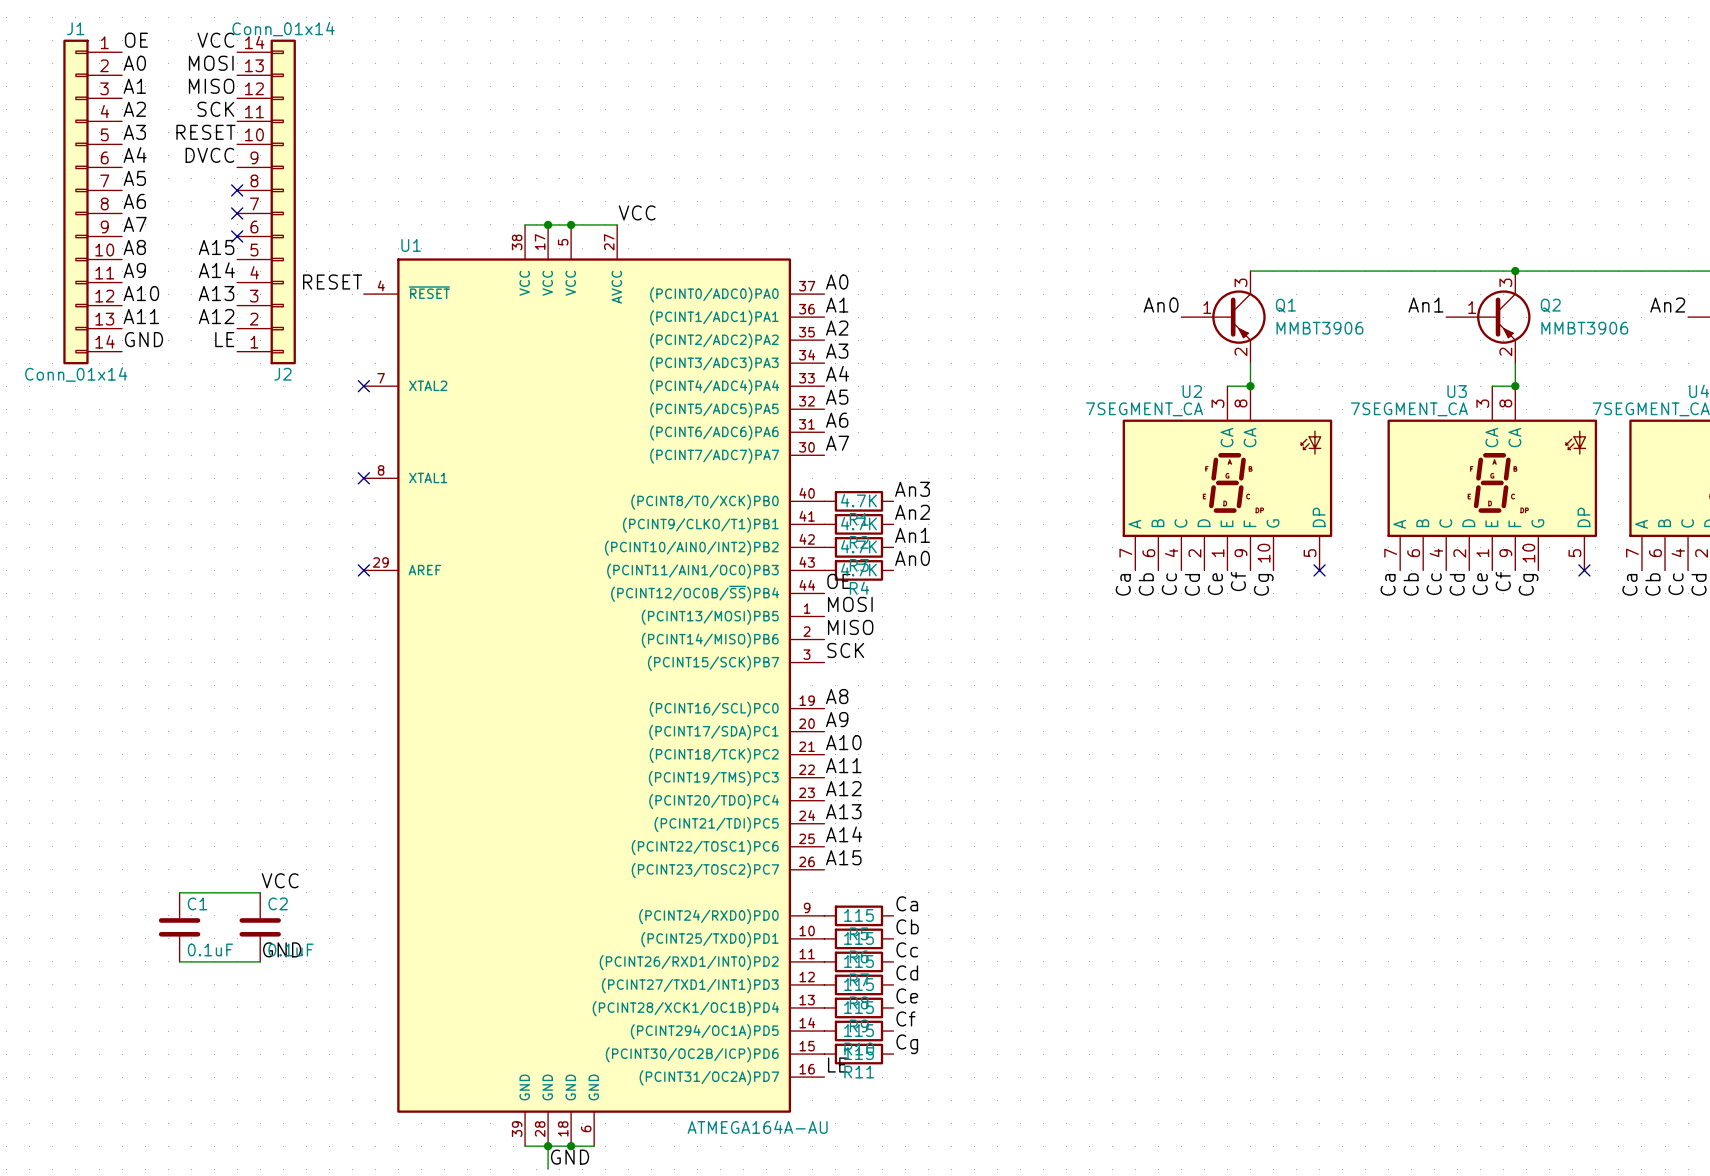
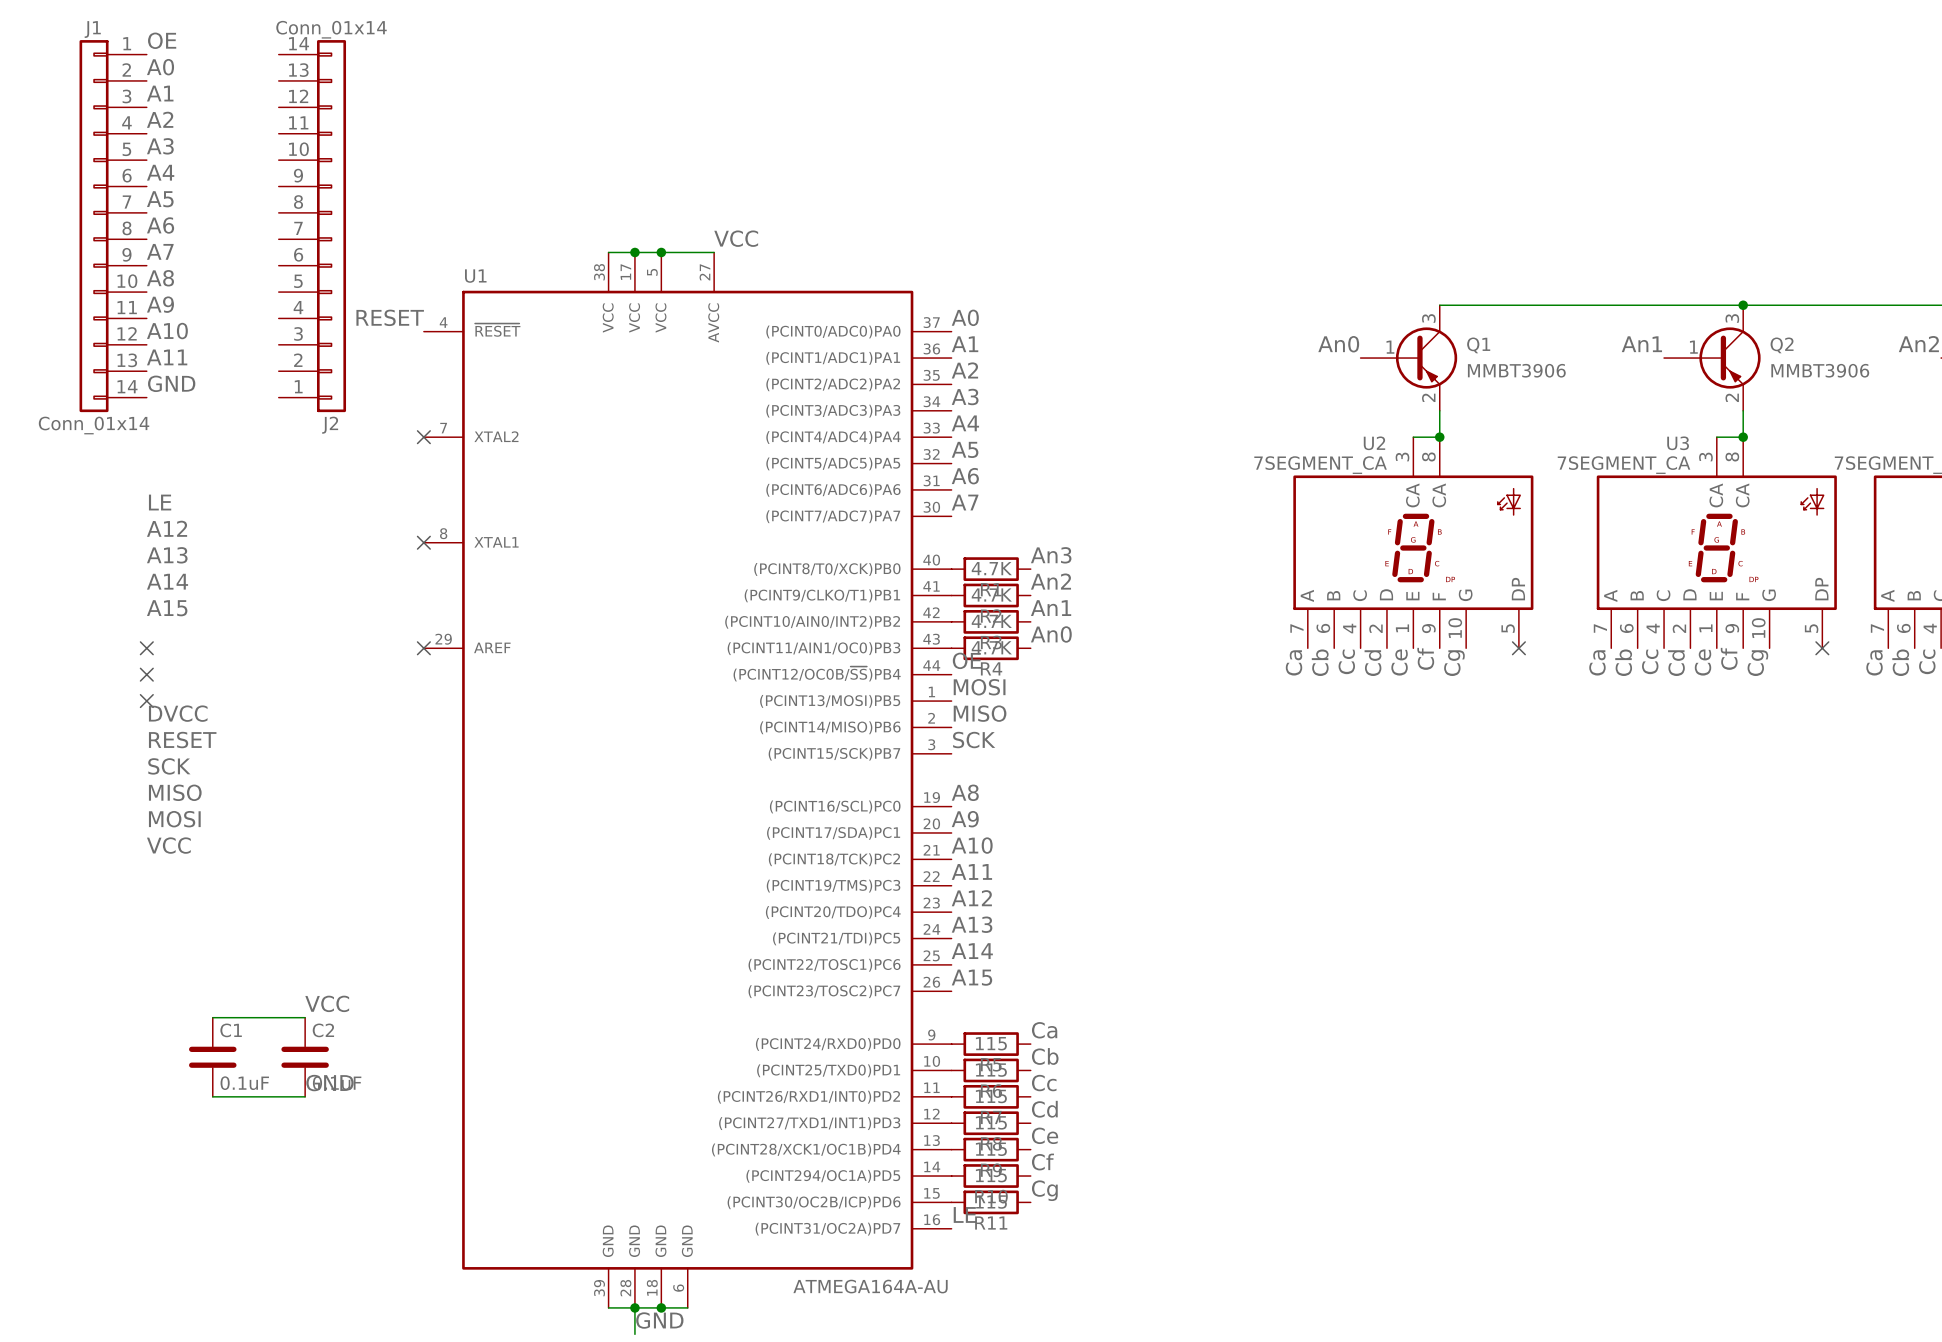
label: VCC (215, 40) -> none
label: MOSI (211, 63) -> none
label: MISO (211, 86) -> none
label: SCK (215, 109) -> none
label: RESET (206, 132) -> none
label: DVCC (209, 155) -> none
no-connect mark: (237, 190) -> none
no-connect mark: (237, 213) -> none
no-connect mark: (237, 236) -> none
label: A15 (216, 247) -> none
label: A14 (216, 270) -> none
label: A13 (216, 293) -> none
label position: A12 (216, 316) -> A12 (167, 528)
label position: LE (224, 339) -> LE (160, 502)
label: none -> A13 (167, 555)
label: none -> A14 (167, 581)
label: none -> A15 (167, 608)
no-connect mark: none -> (146, 648)
no-connect mark: none -> (146, 674)
no-connect mark: none -> (146, 701)
label: none -> DVCC (178, 713)
label: none -> RESET (182, 740)
label: none -> SCK (169, 766)
label: none -> MISO (175, 792)
label: none -> MOSI (174, 819)
label: none -> VCC (168, 845)

